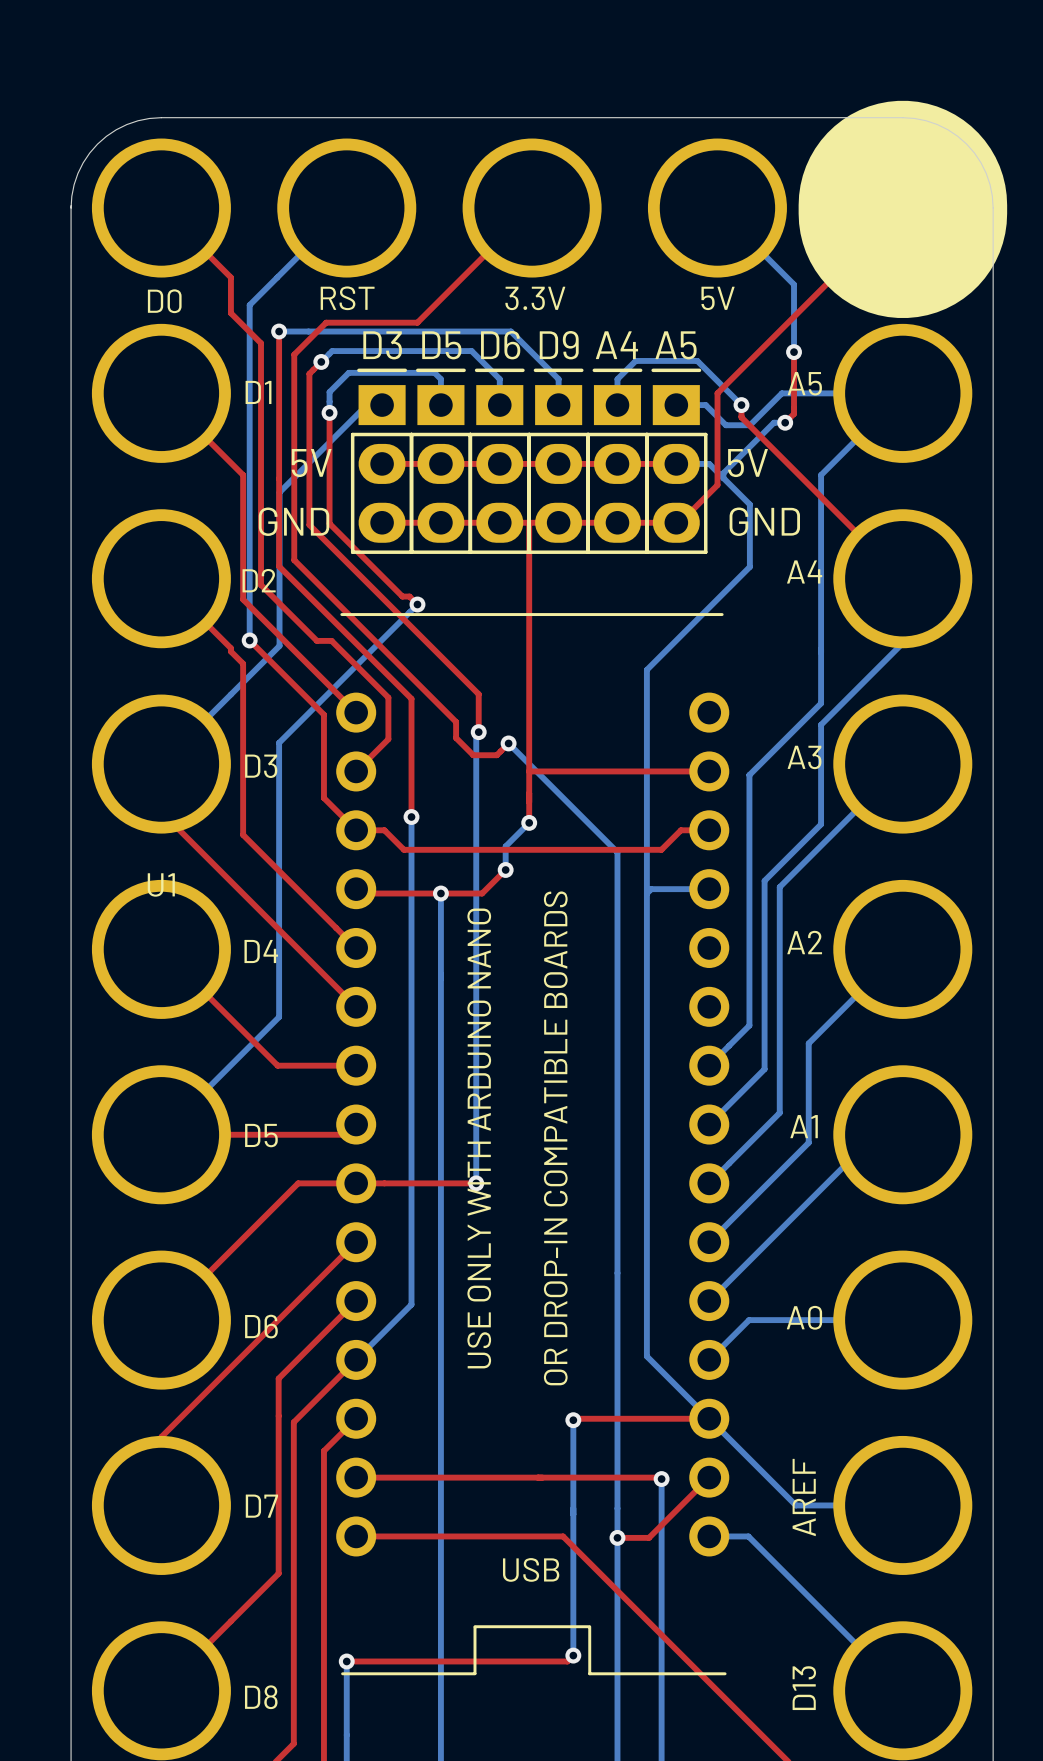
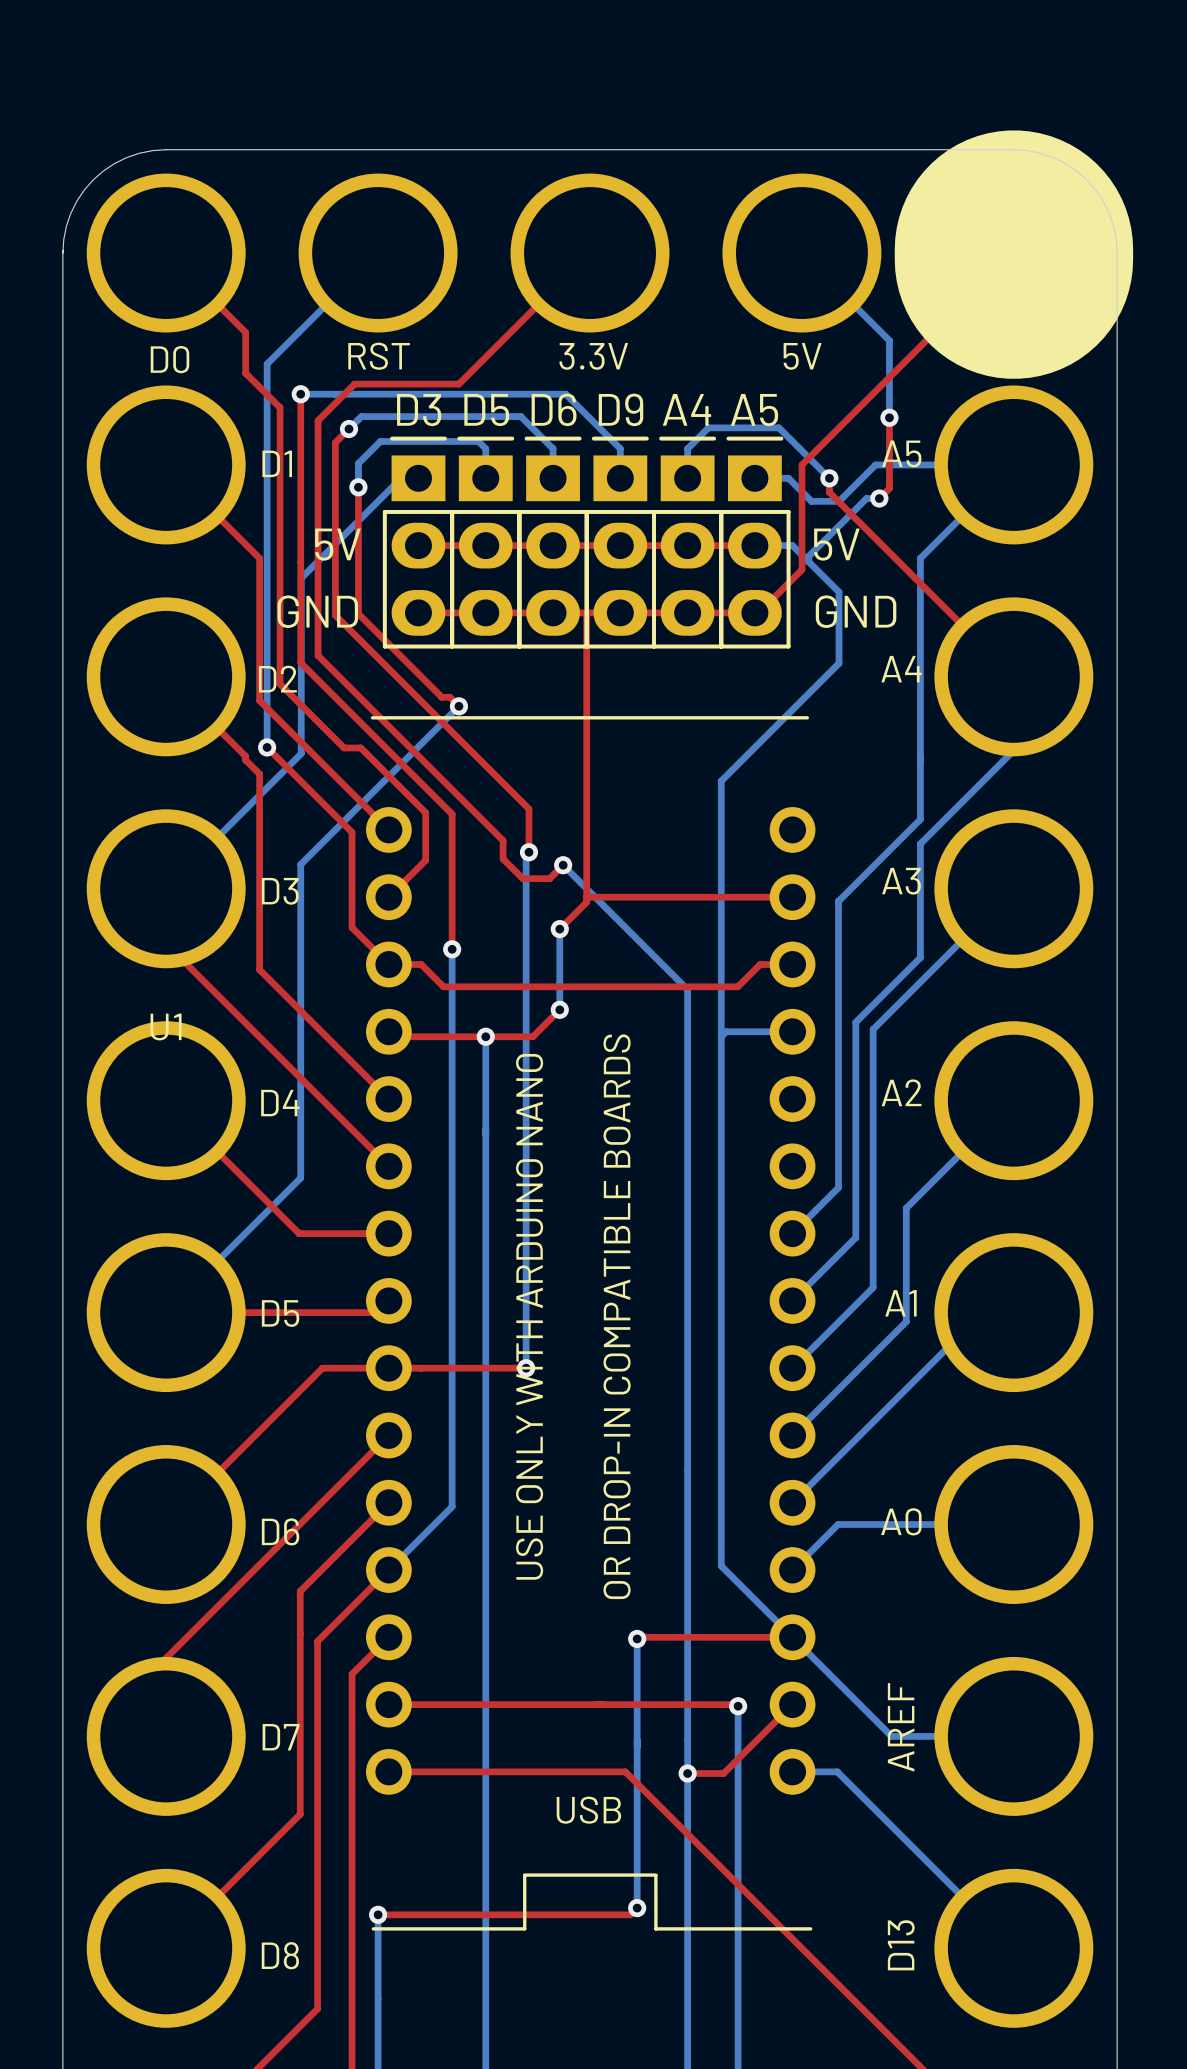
top track: (529, 775) (529, 822) -> (586, 902) (559, 929)
bottom track: (529, 822) (505, 846) -> (559, 929) (559, 982)
via position: (529, 822) -> (559, 929)

